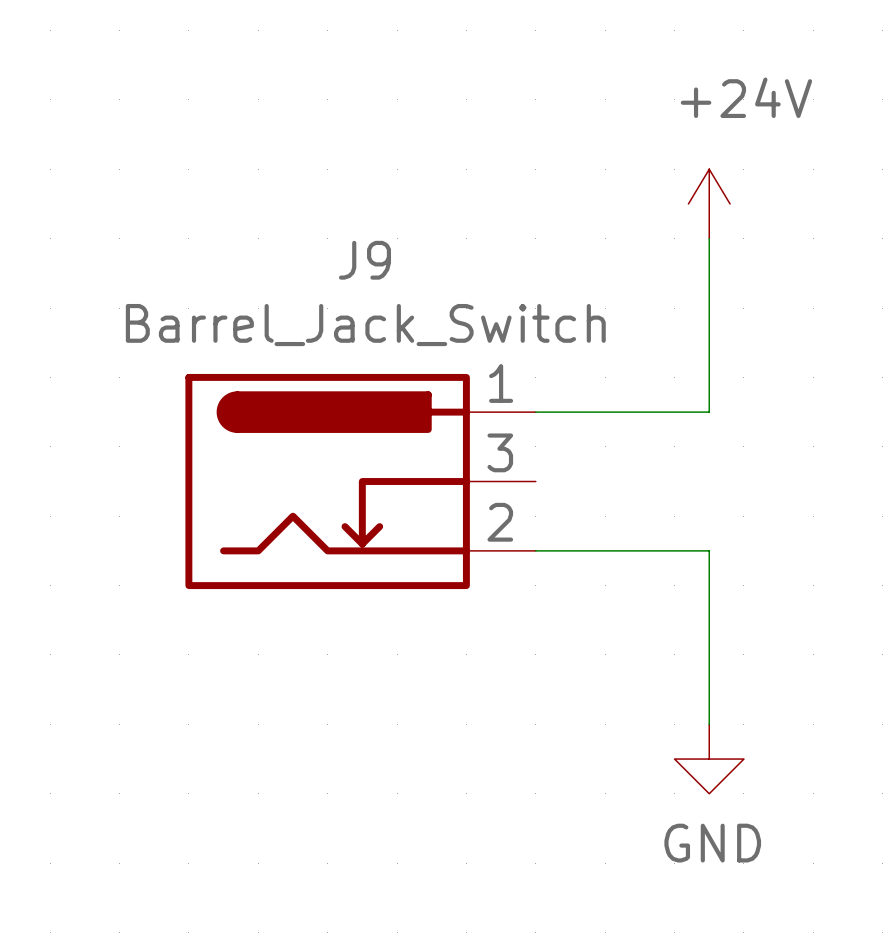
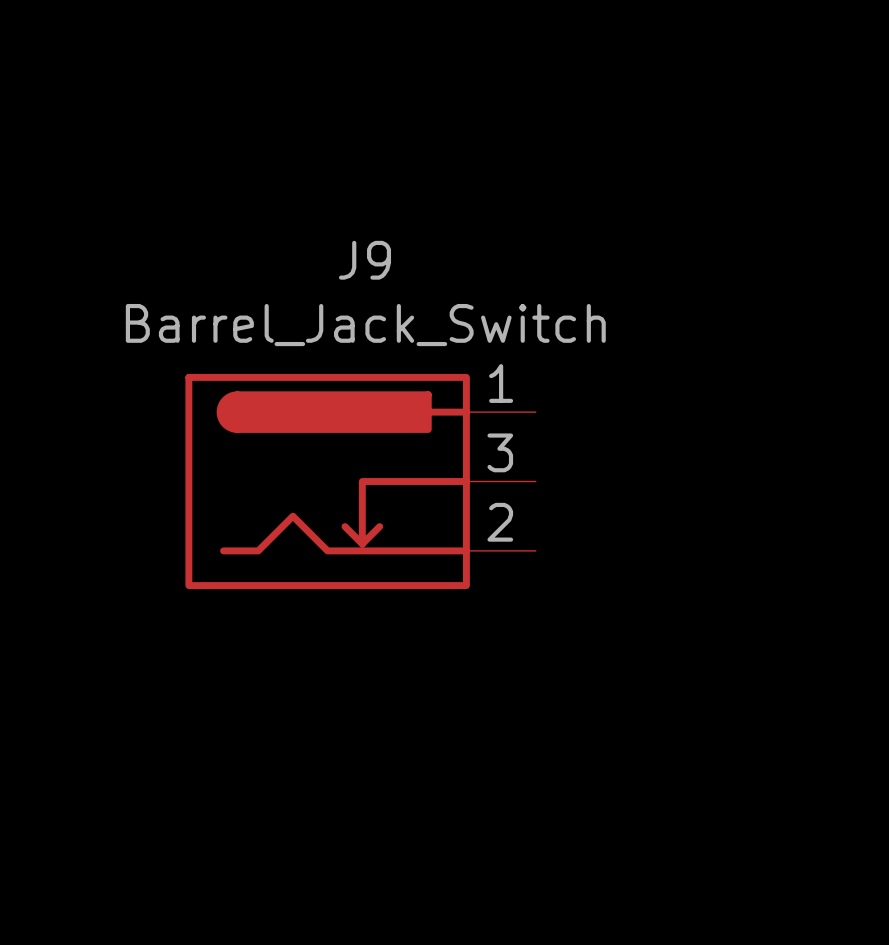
power symbol: +24V (709, 203) -> none
wire: (709, 238) (709, 412) (535, 412) -> none
wire: (535, 550) (709, 550) (709, 724) -> none
power symbol: GND (709, 759) -> none

